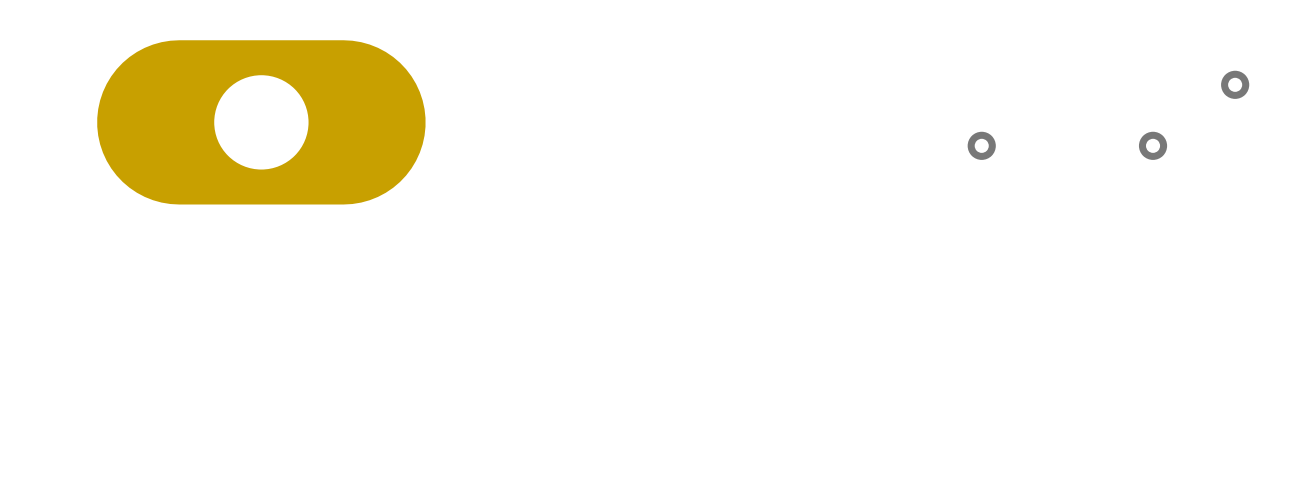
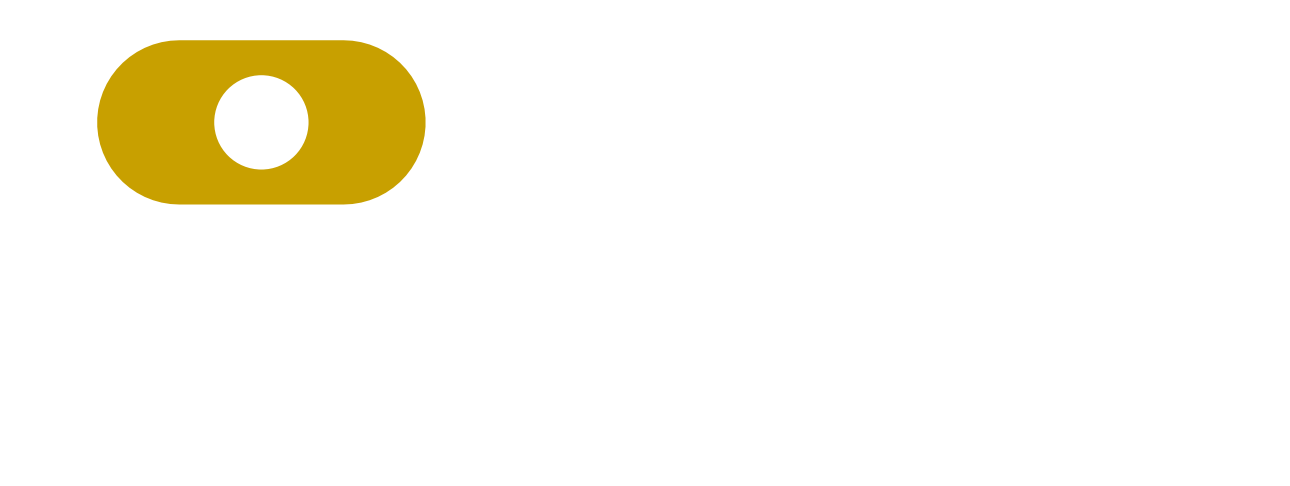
via: (1235, 84) -> none
via: (981, 145) -> none
via: (1153, 145) -> none

